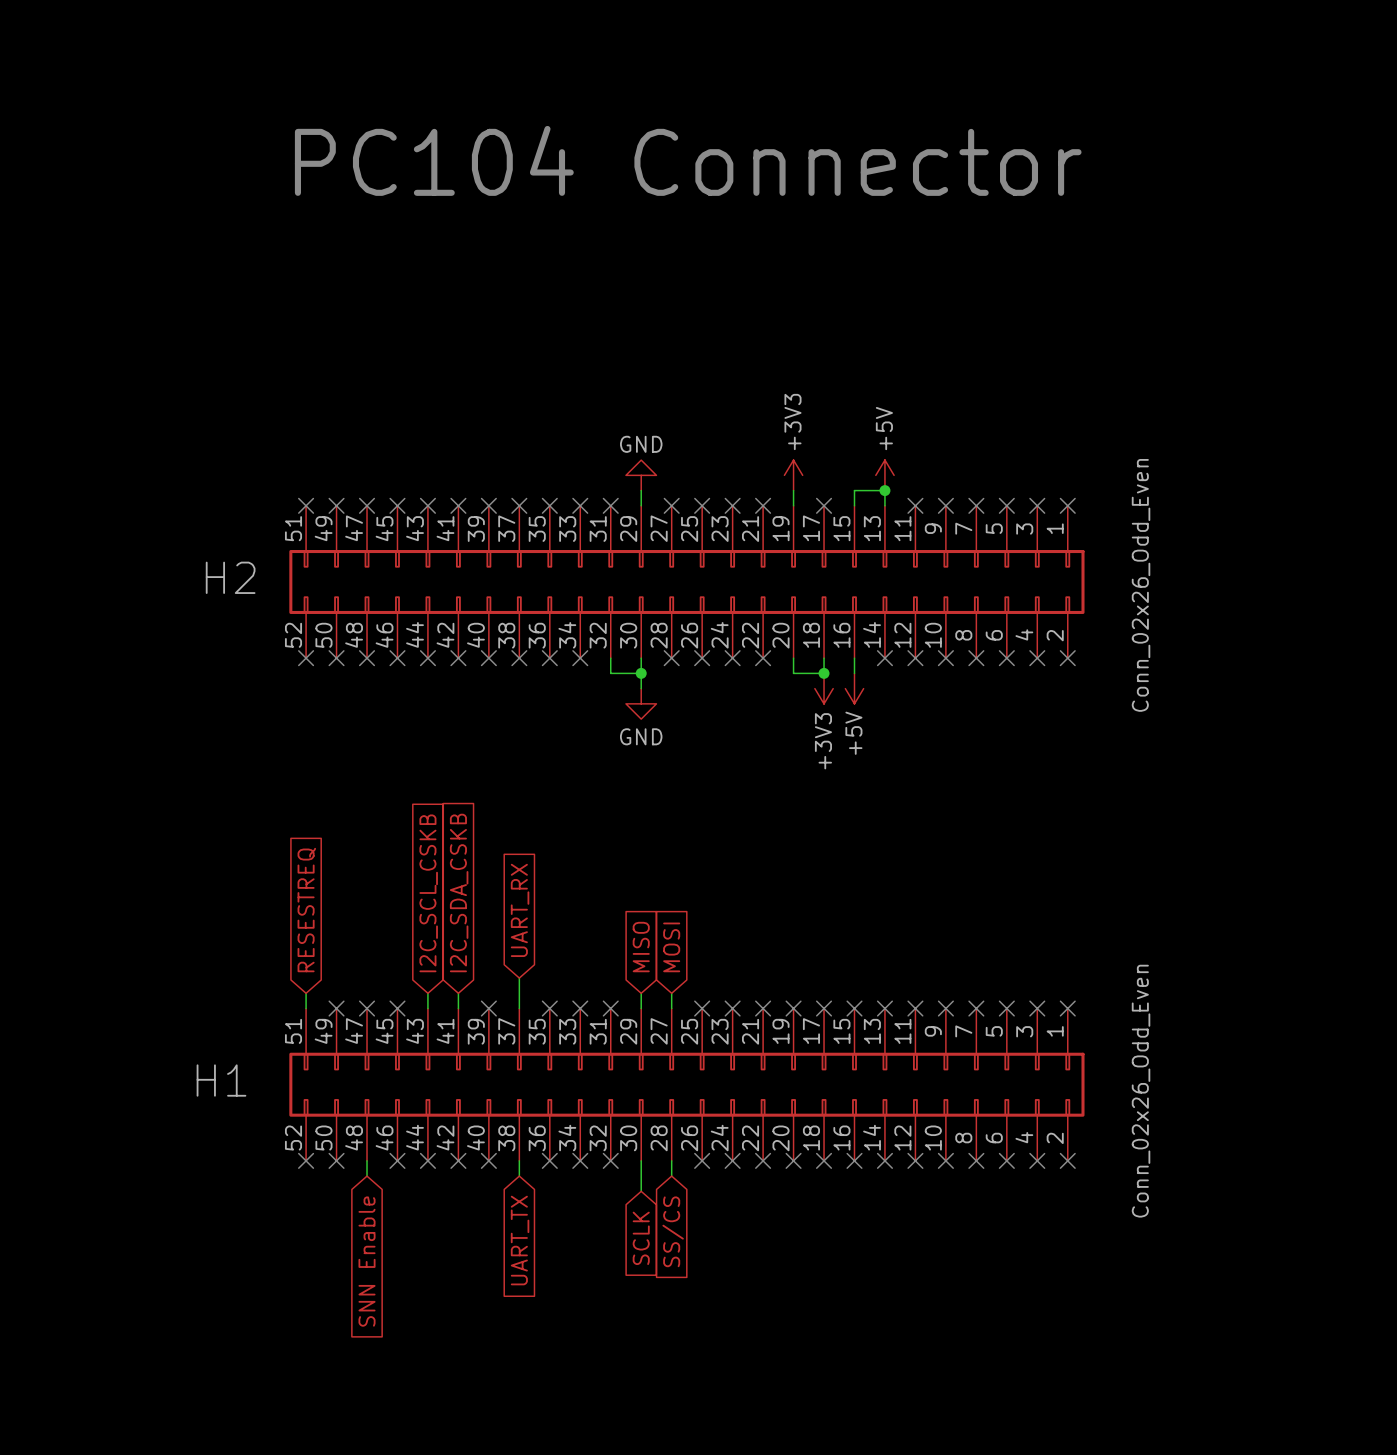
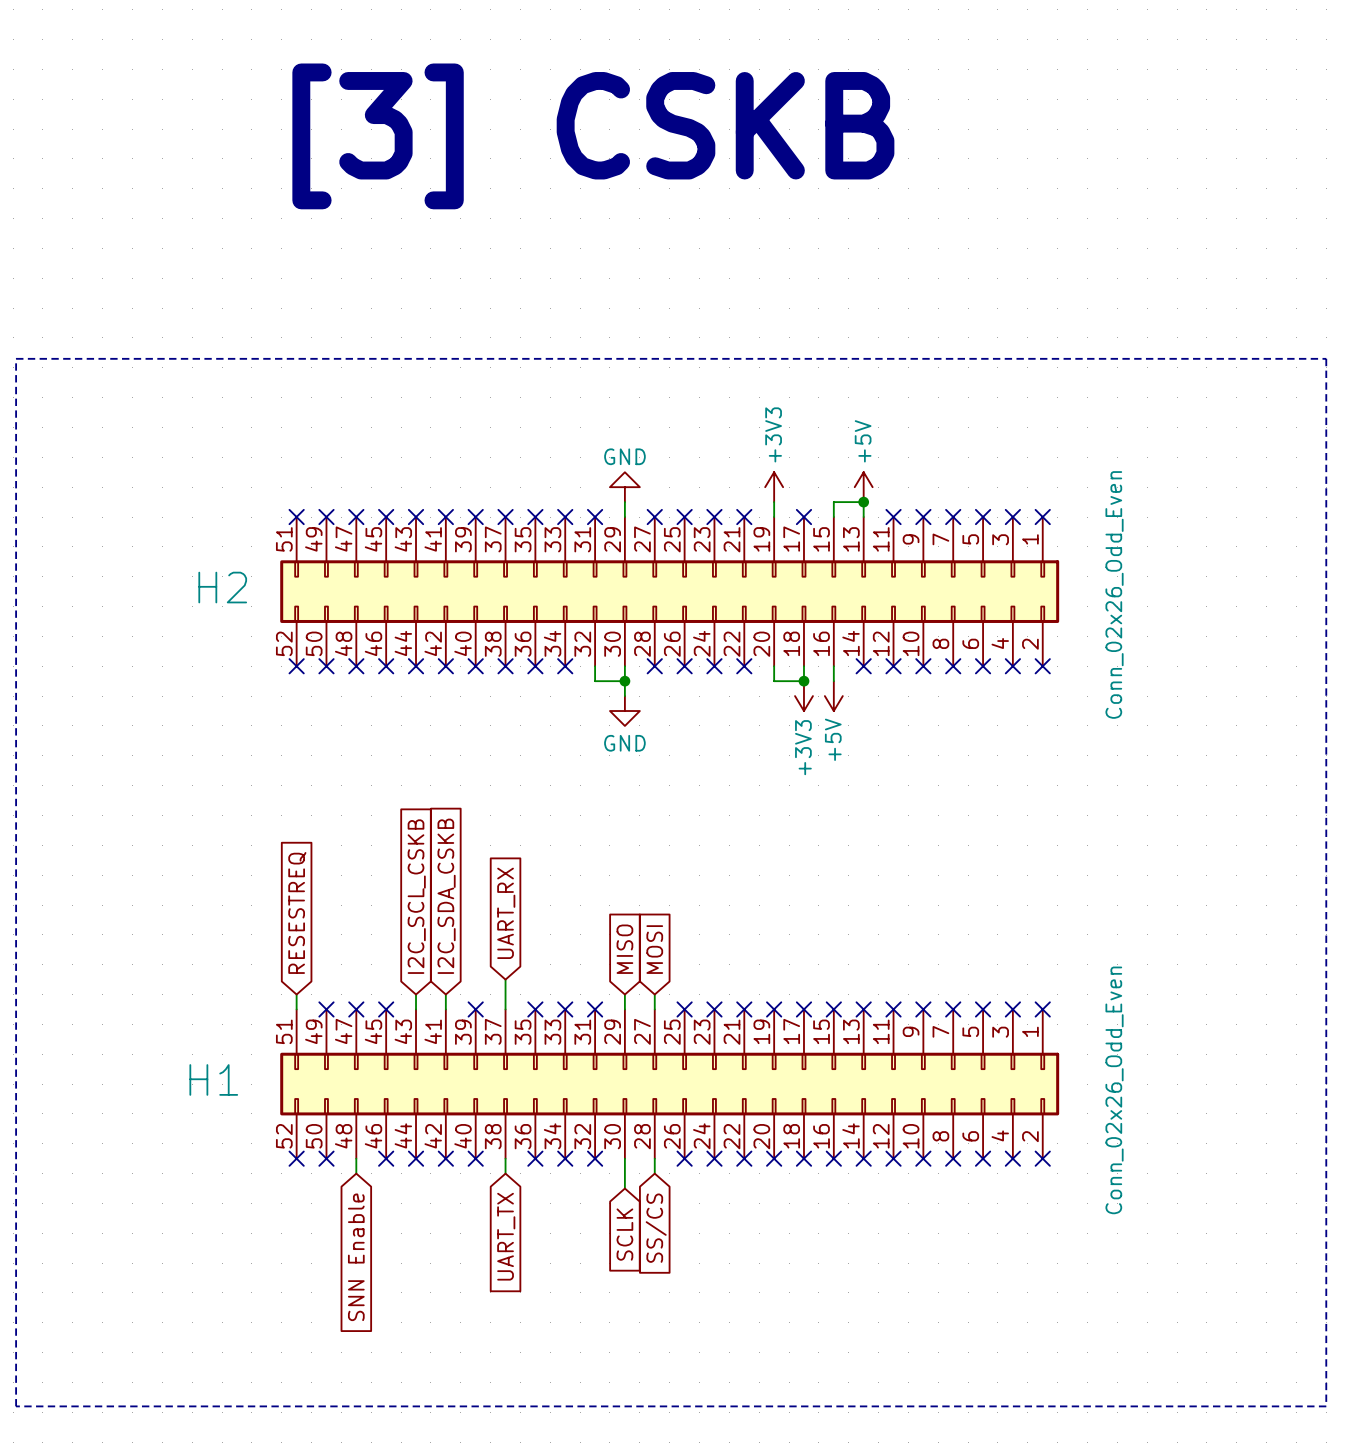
text: none -> [3] CSKB (593, 136)
text: PC104 Connector (688, 160) -> none
line: none -> (16, 358) (1326, 358) (1326, 1406) (16, 1406) (16, 358)

